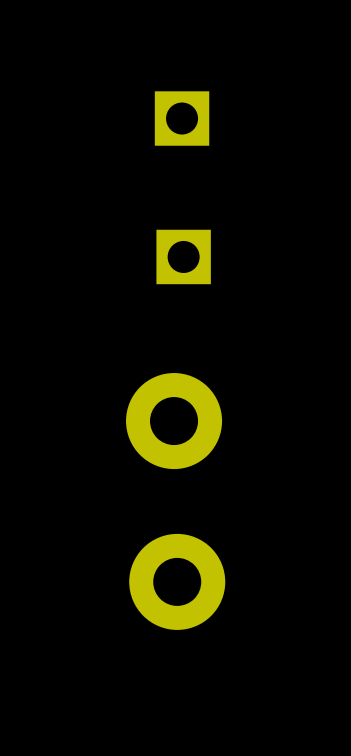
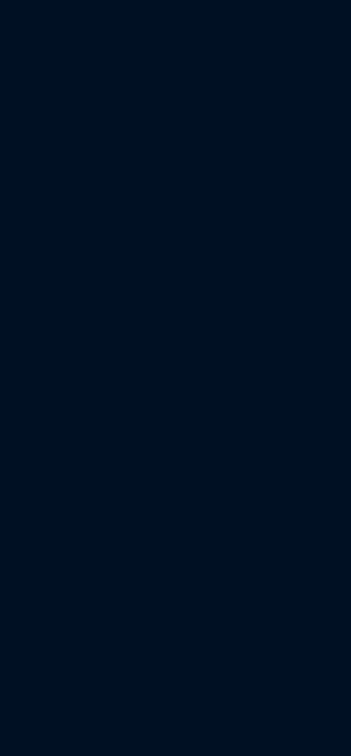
part: (182, 118) -> none
part: (183, 256) -> none
part: (174, 421) -> none
part: (177, 581) -> none

